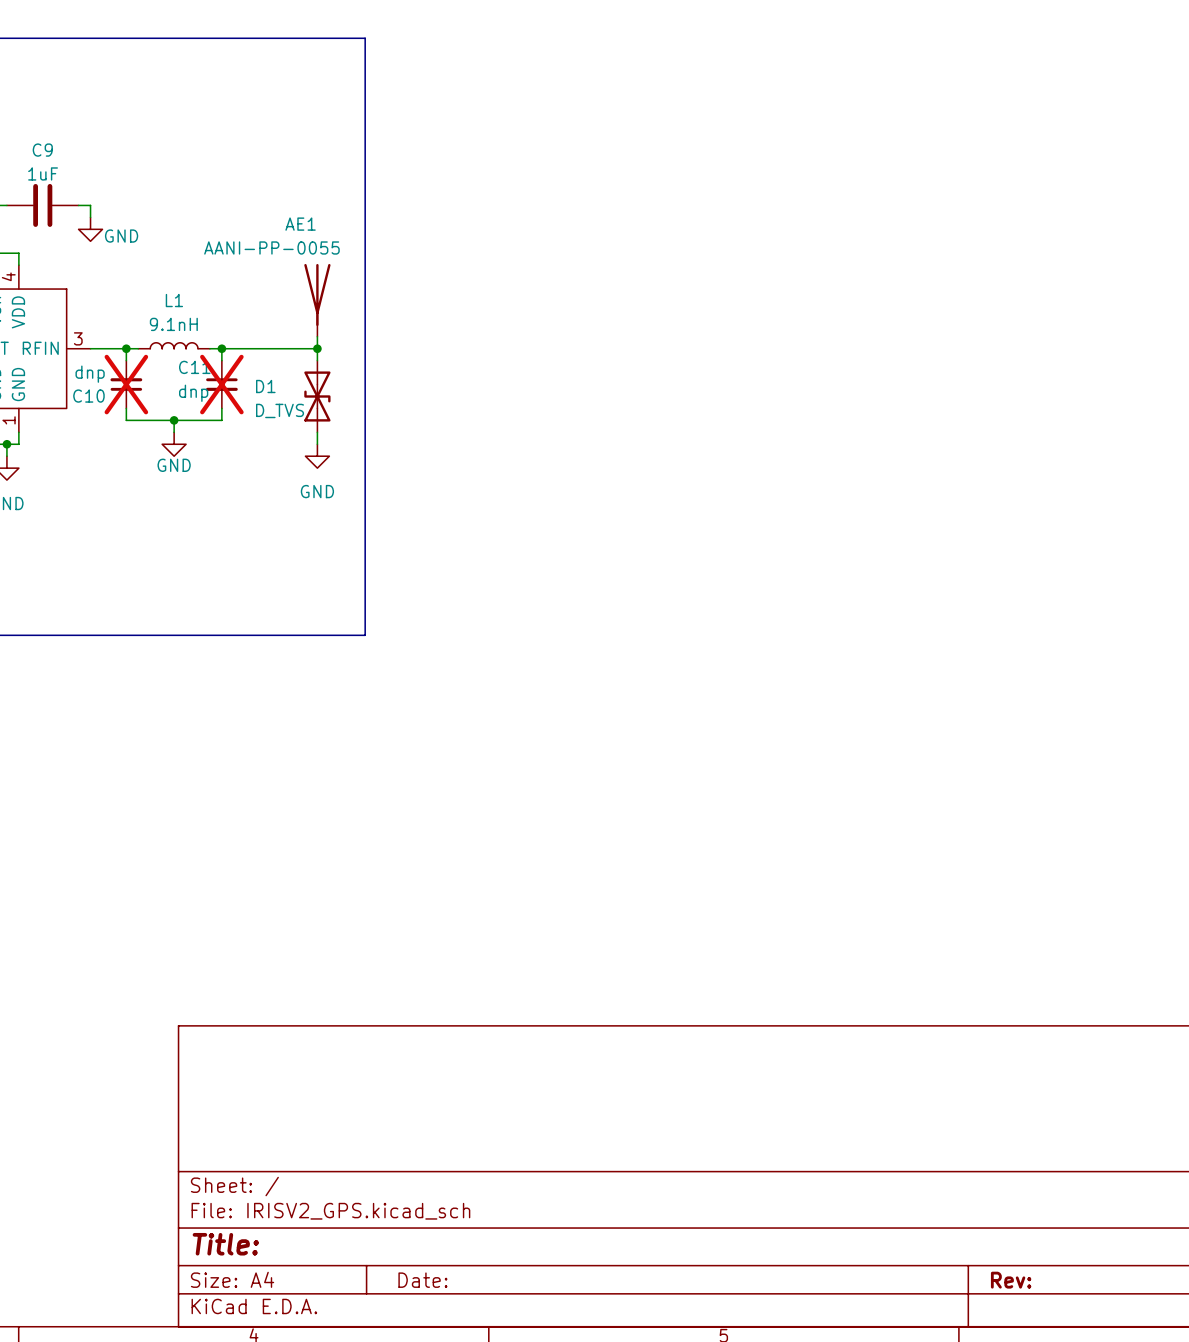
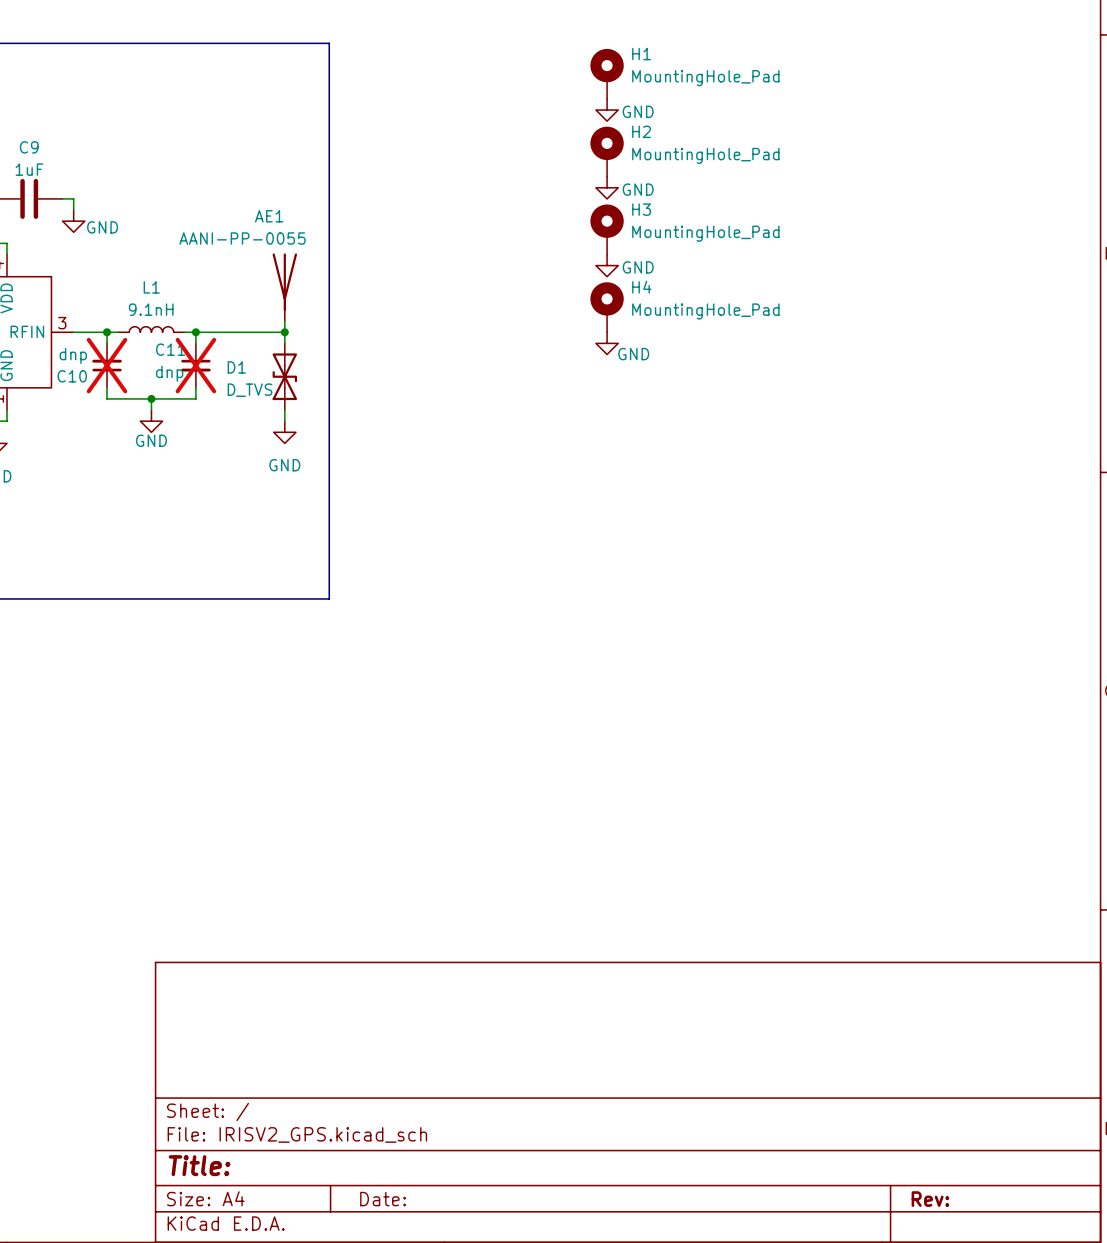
H1: none -> MountingHole_Pad (607, 73)
power symbol: none -> GND (607, 110)
H2: none -> MountingHole_Pad (607, 151)
power symbol: none -> GND (607, 187)
H3: none -> MountingHole_Pad (607, 229)
power symbol: none -> GND (607, 265)
H4: none -> MountingHole_Pad (607, 307)
power symbol: none -> GND (607, 343)

